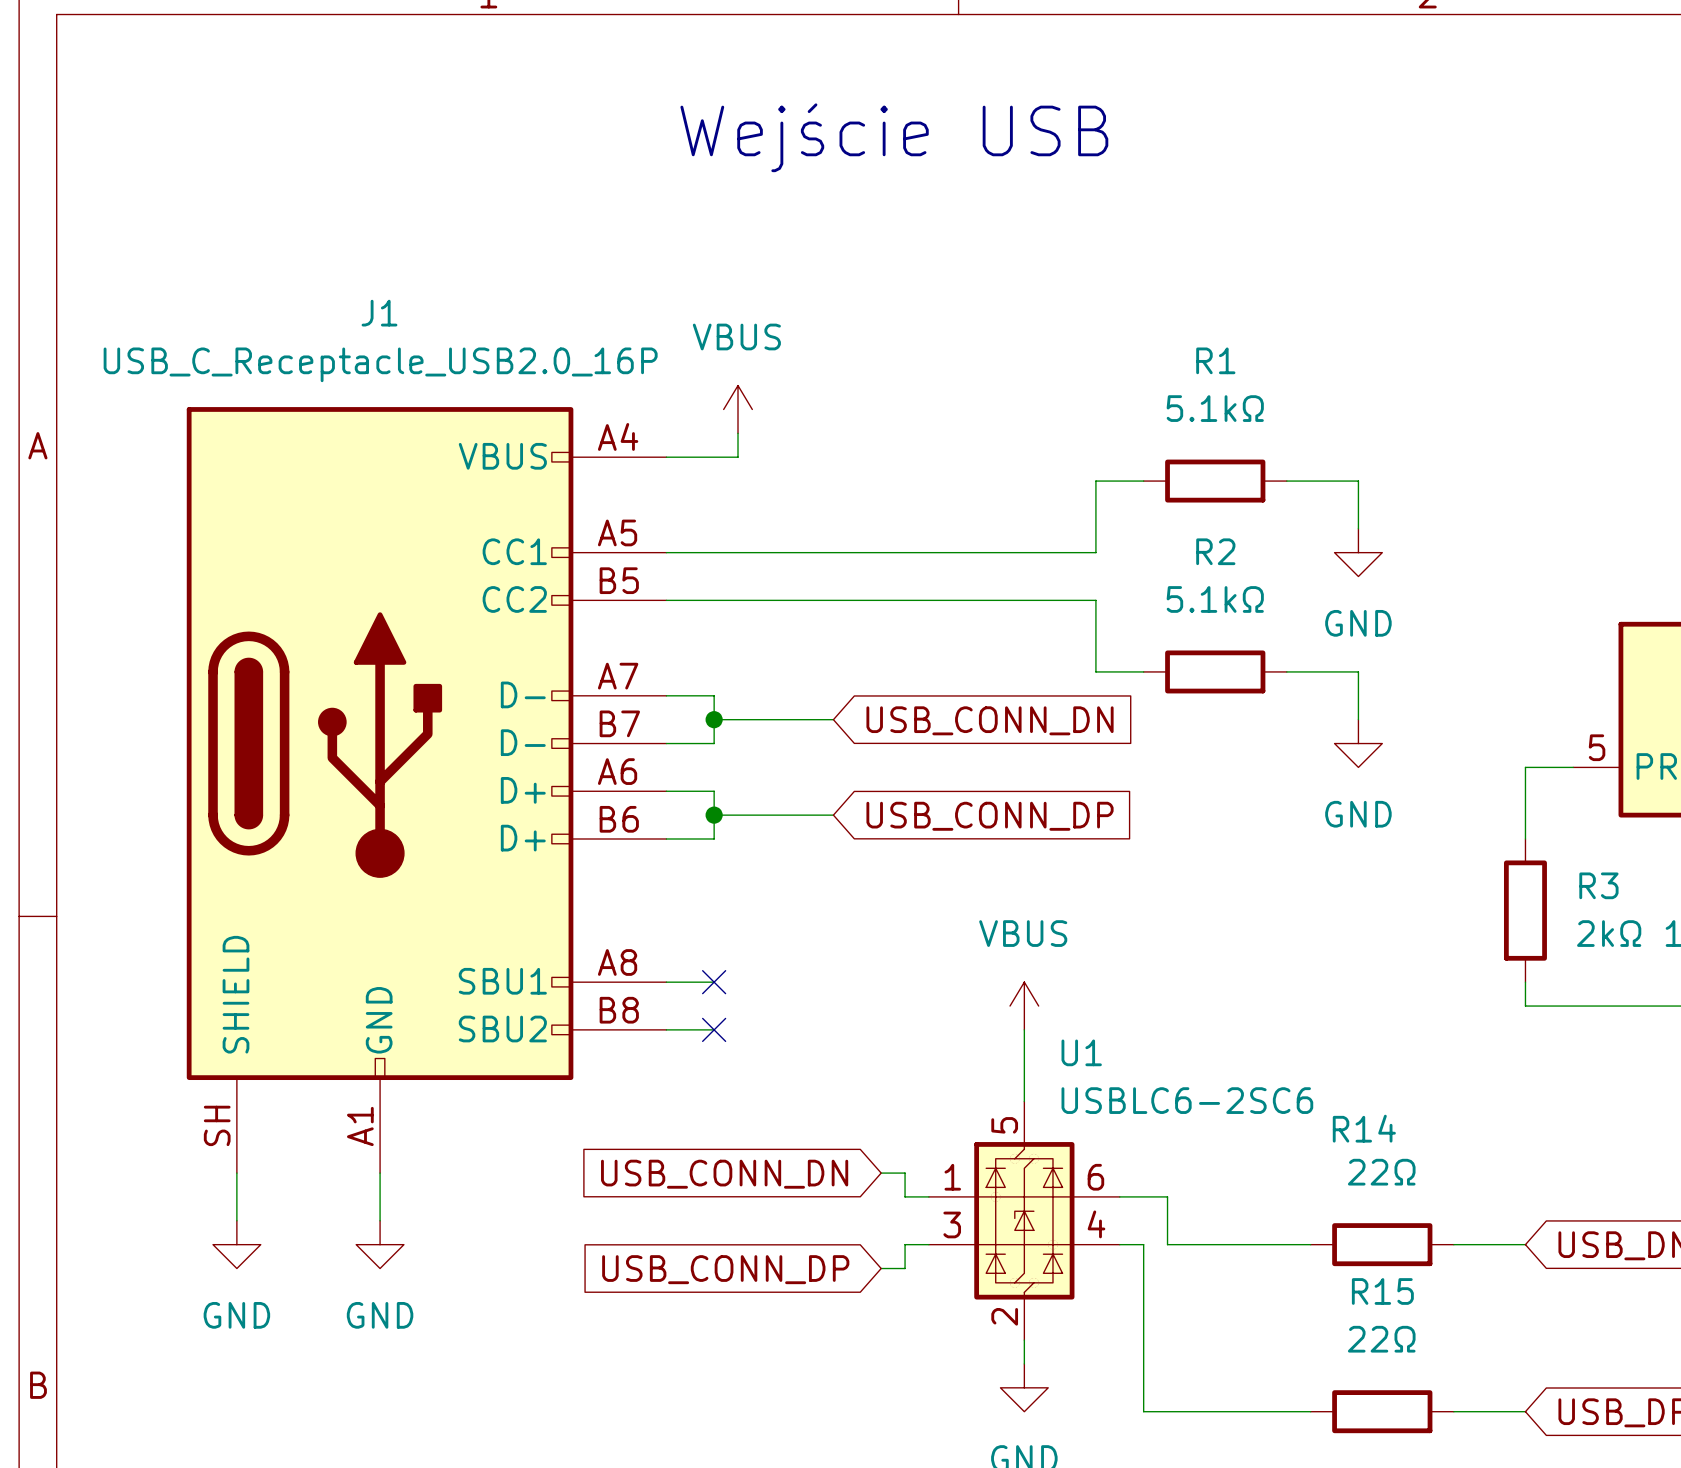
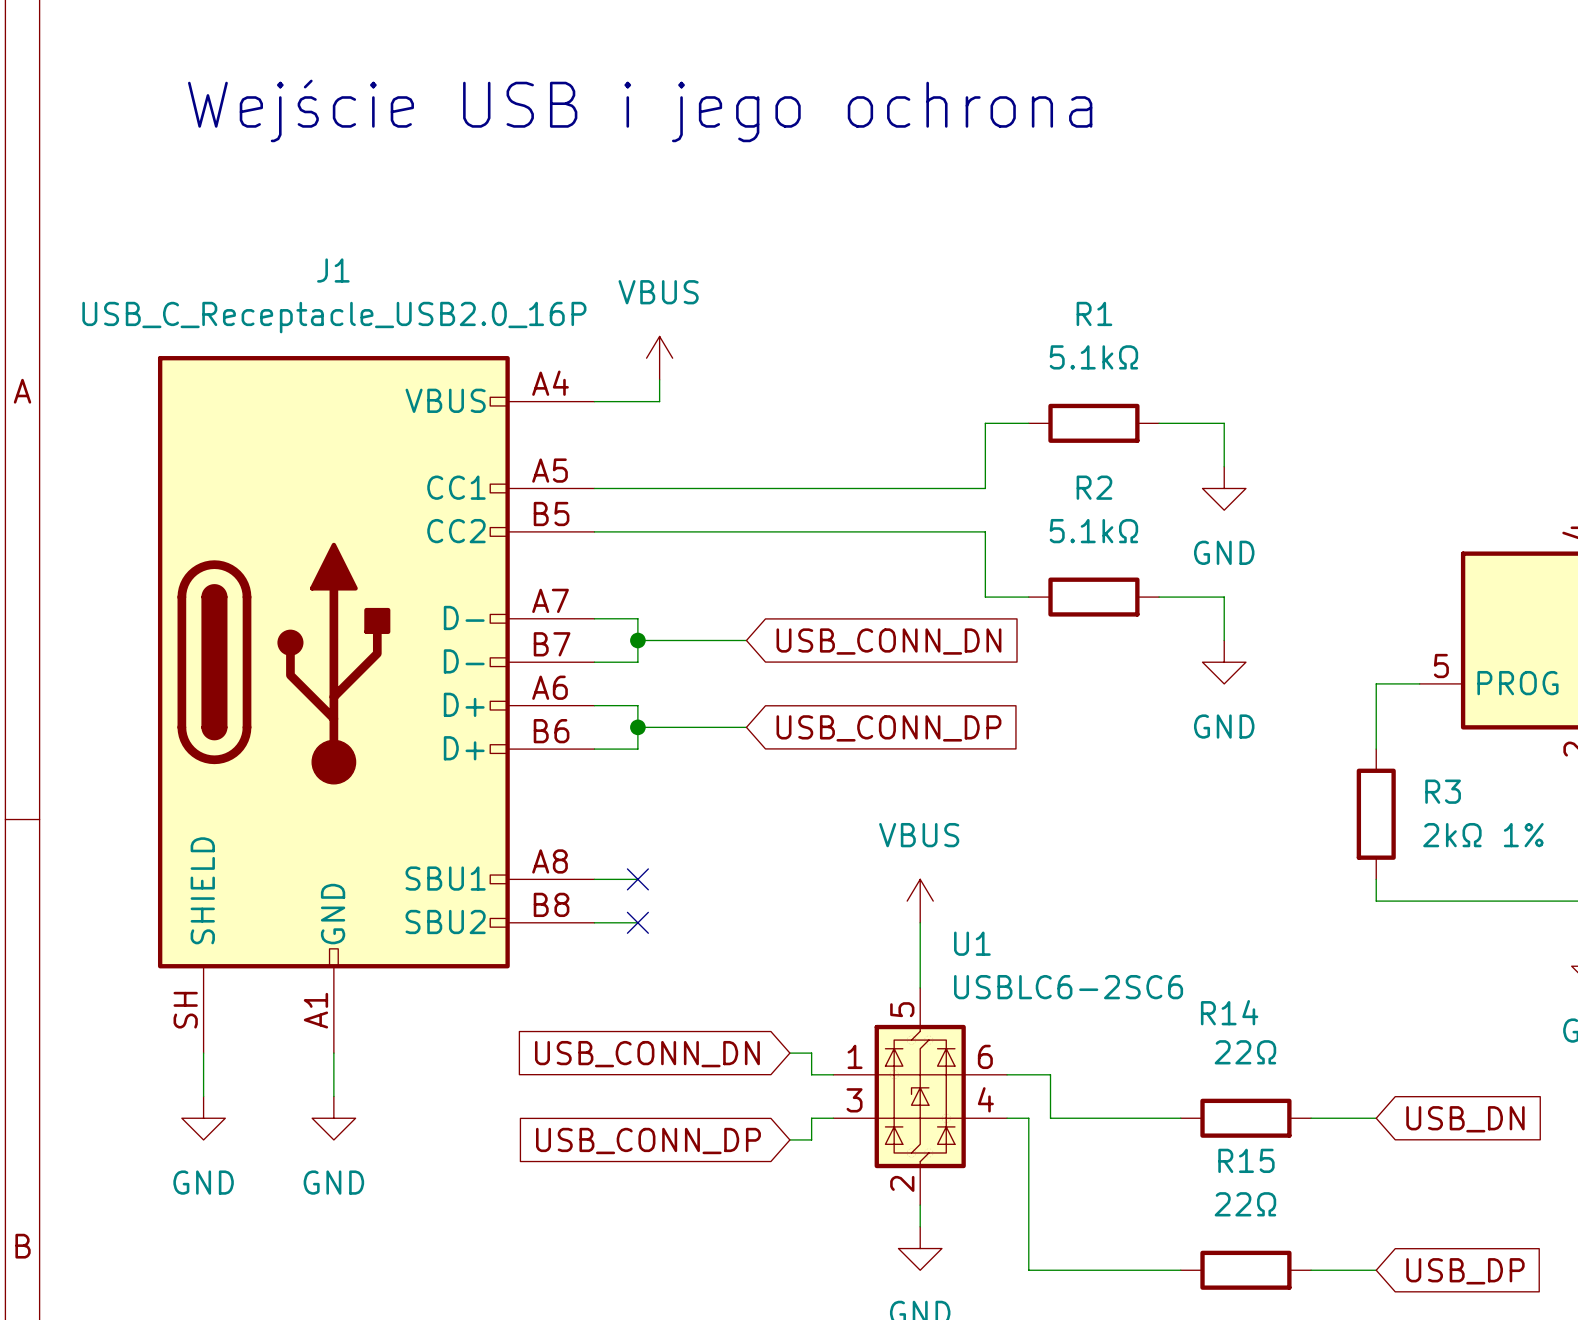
text: none -> Wejście USB i jego ochrona (640, 110)
text: Wejście USB (894, 137) -> none

